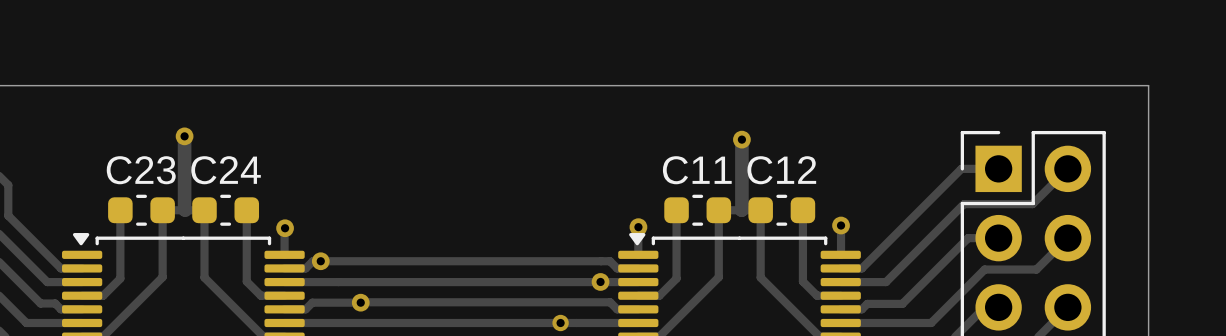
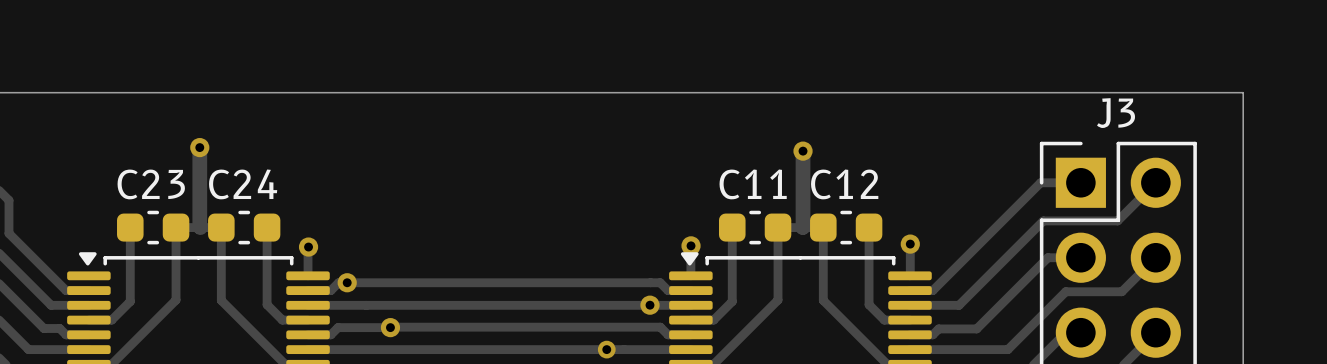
J3 name: none -> J3 (1116, 113)

